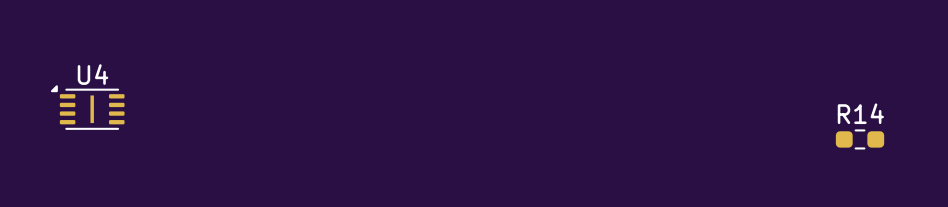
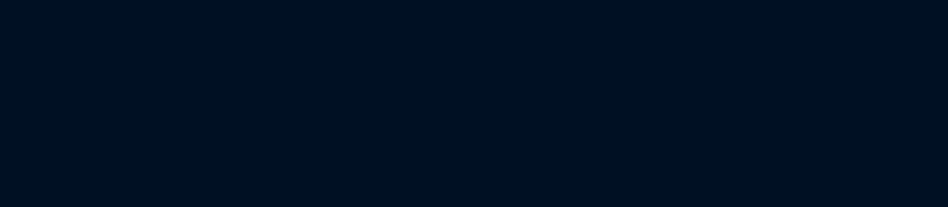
U4: (87, 107) -> none
R14: (860, 139) -> none

